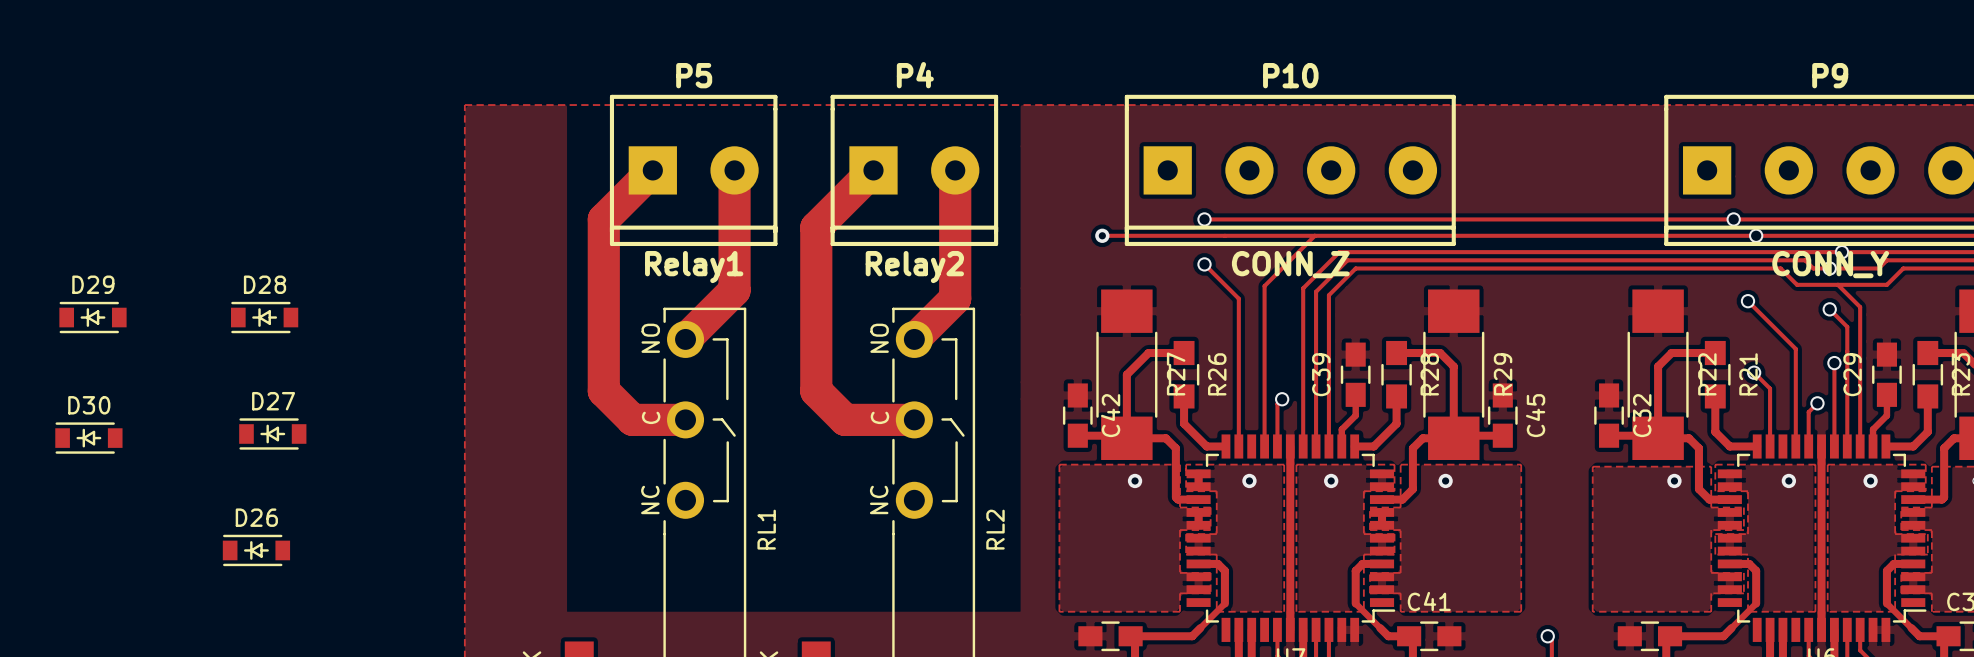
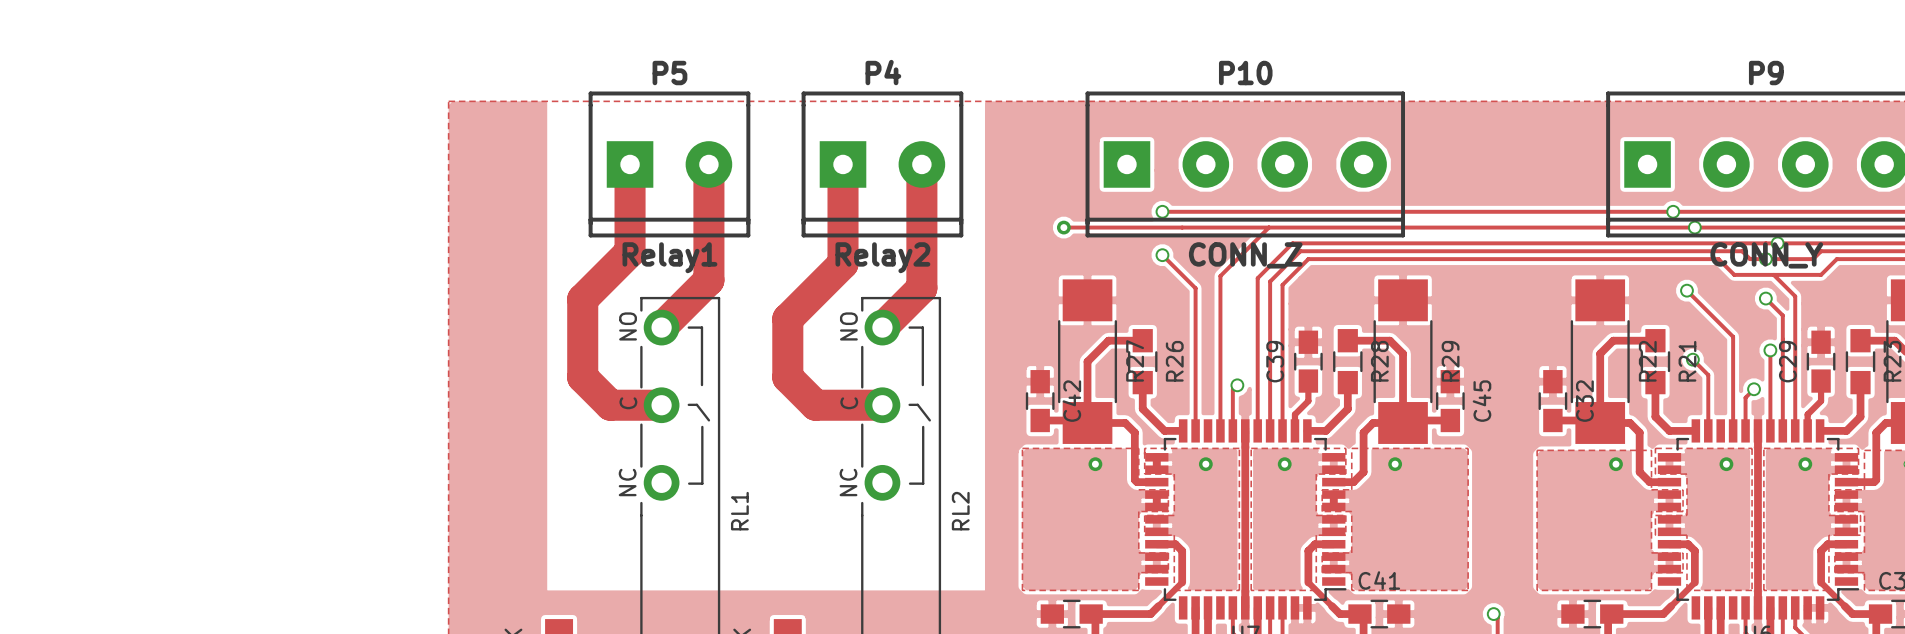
track: (652, 170) (603, 219) (603, 310) -> (630, 164) (630, 251) (582, 299)
track: (873, 170) (816, 227) (816, 330) -> (843, 164) (843, 263) (787, 318)
D29: (92, 317) -> none
D28: (264, 317) -> none
D27: (272, 433) -> none
D30: (88, 438) -> none
D26: (256, 550) -> none

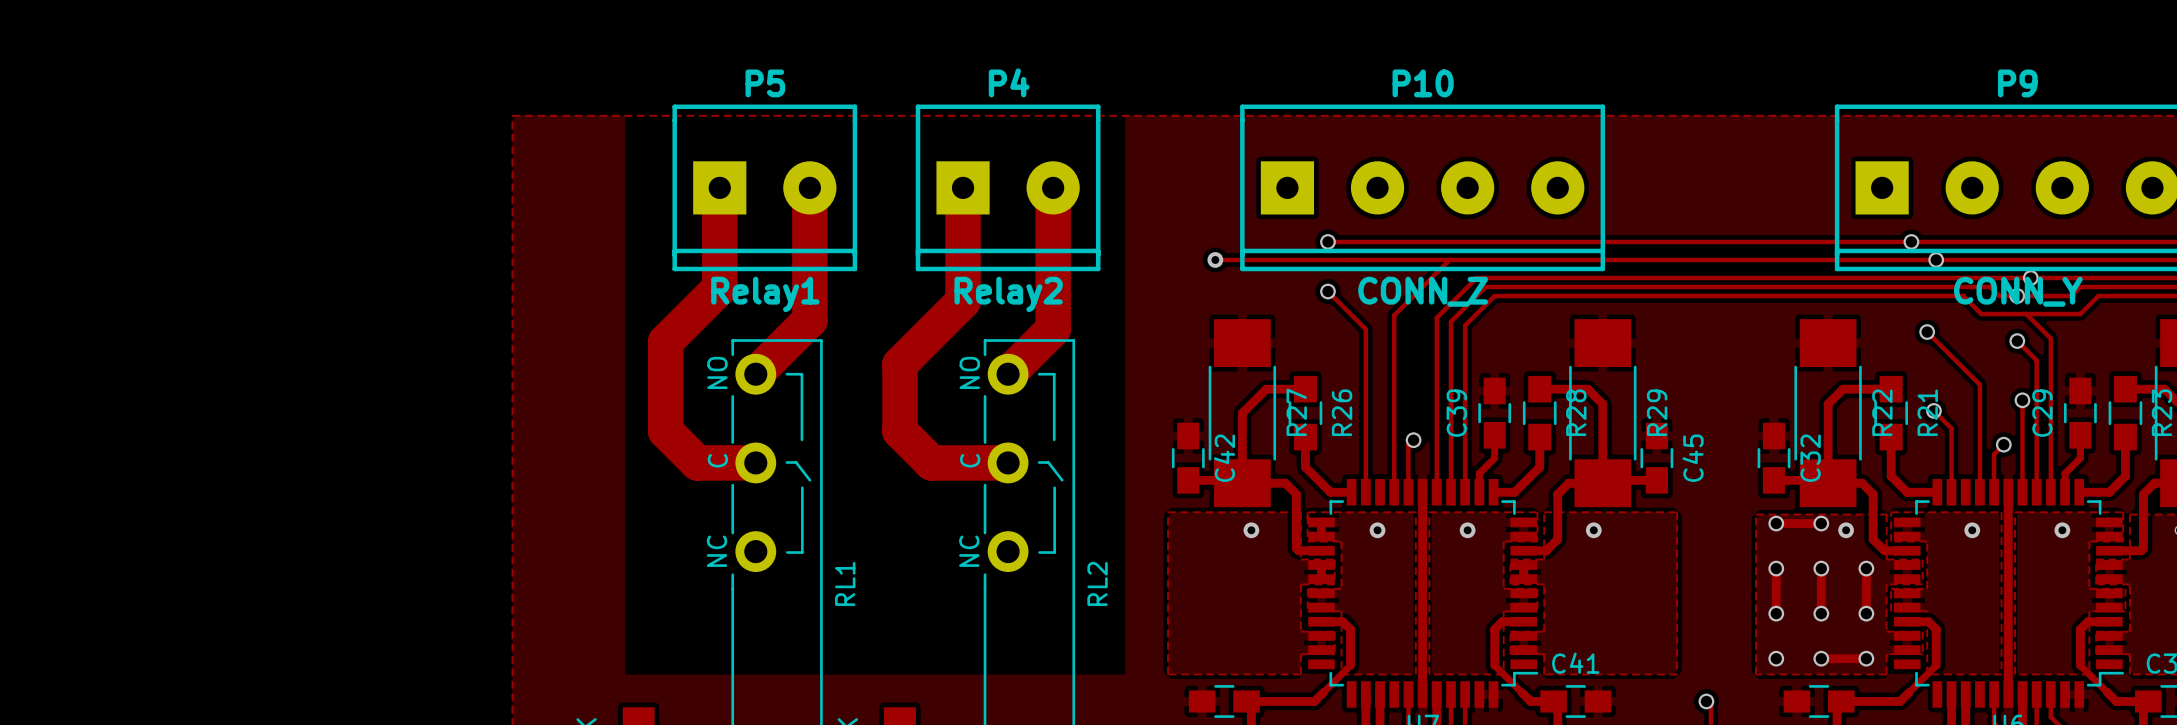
track: none -> (1776, 523) (1821, 523)
via: none -> (1776, 523)
via: none -> (1821, 523)
track: none -> (1776, 568) (1776, 613)
via: none -> (1776, 568)
track: none -> (1821, 568) (1821, 613)
via: none -> (1821, 568)
track: none -> (1866, 568) (1866, 613)
via: none -> (1866, 568)
via: none -> (1776, 613)
via: none -> (1821, 613)
via: none -> (1866, 613)
via: none -> (1776, 658)
track: none -> (1821, 658) (1866, 658)
via: none -> (1821, 658)
via: none -> (1866, 658)

